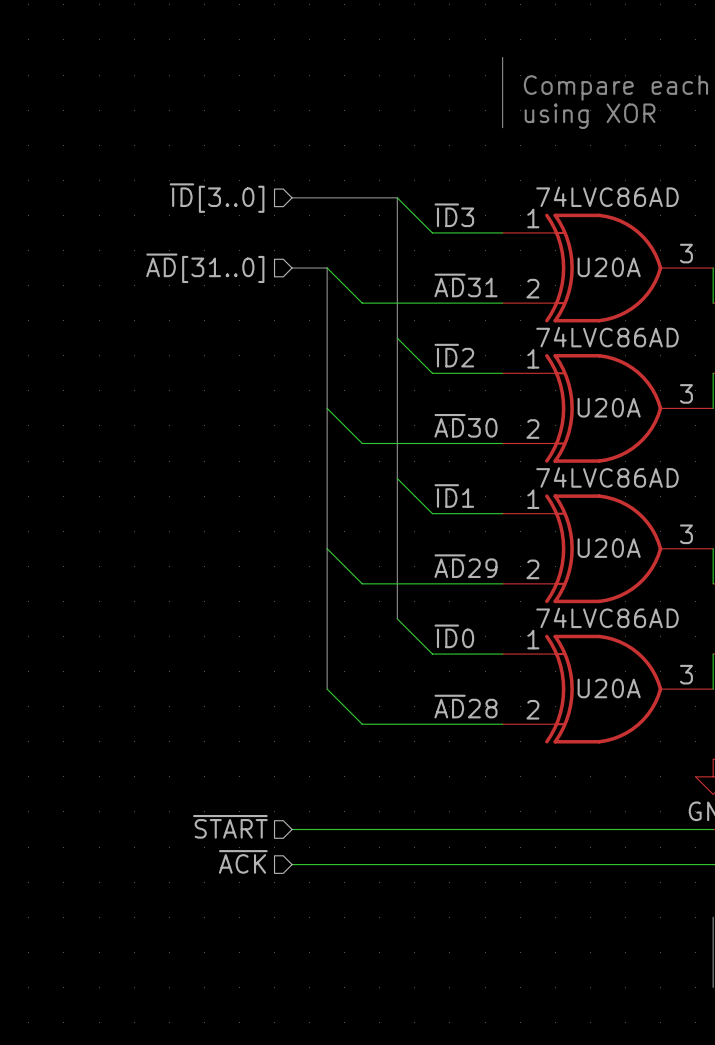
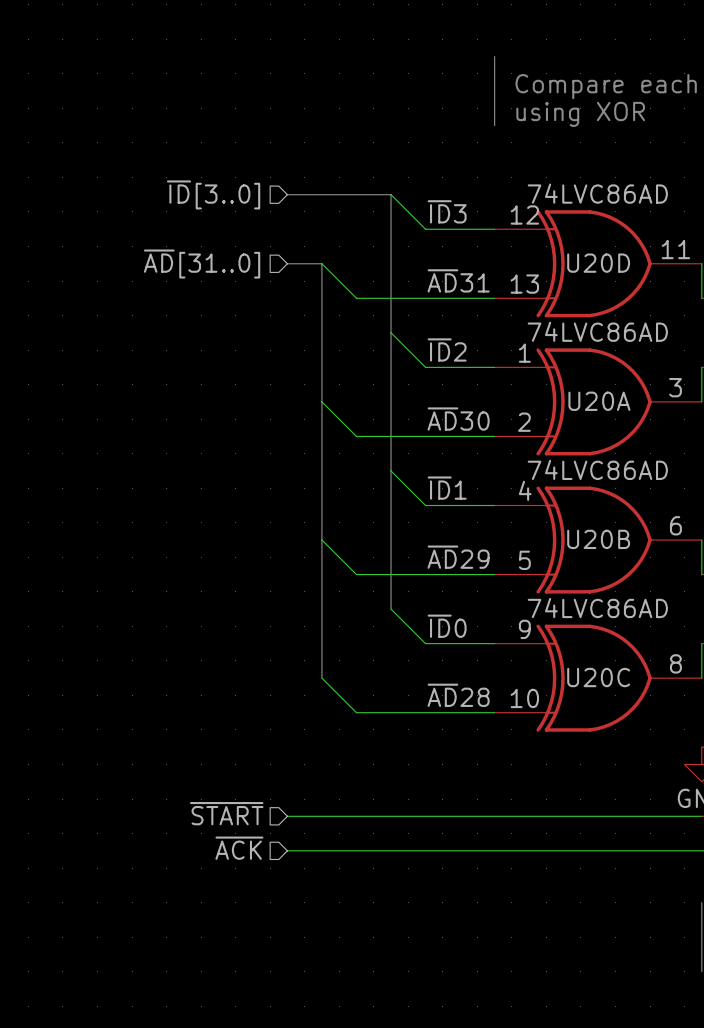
U20A pin number: 1 (533, 218) -> 12 (524, 214)
U20A pin number: 3 (686, 253) -> 11 (675, 249)
U20A name: U20A (609, 267) -> U20D (598, 263)
U20A pin number: 2 (532, 288) -> 13 (524, 284)
U20A pin number: 1 (533, 499) -> 4 (525, 490)
U20A pin number: 3 (686, 534) -> 6 (675, 525)
U20A name: U20A (609, 548) -> U20B (598, 539)
U20A pin number: 2 (532, 569) -> 5 (524, 560)
U20A pin number: 1 (533, 639) -> 9 (524, 629)
U20A pin number: 3 (686, 674) -> 8 (675, 663)
U20A name: U20A (609, 688) -> U20C (598, 677)
U20A pin number: 2 (532, 709) -> 10 (524, 698)

